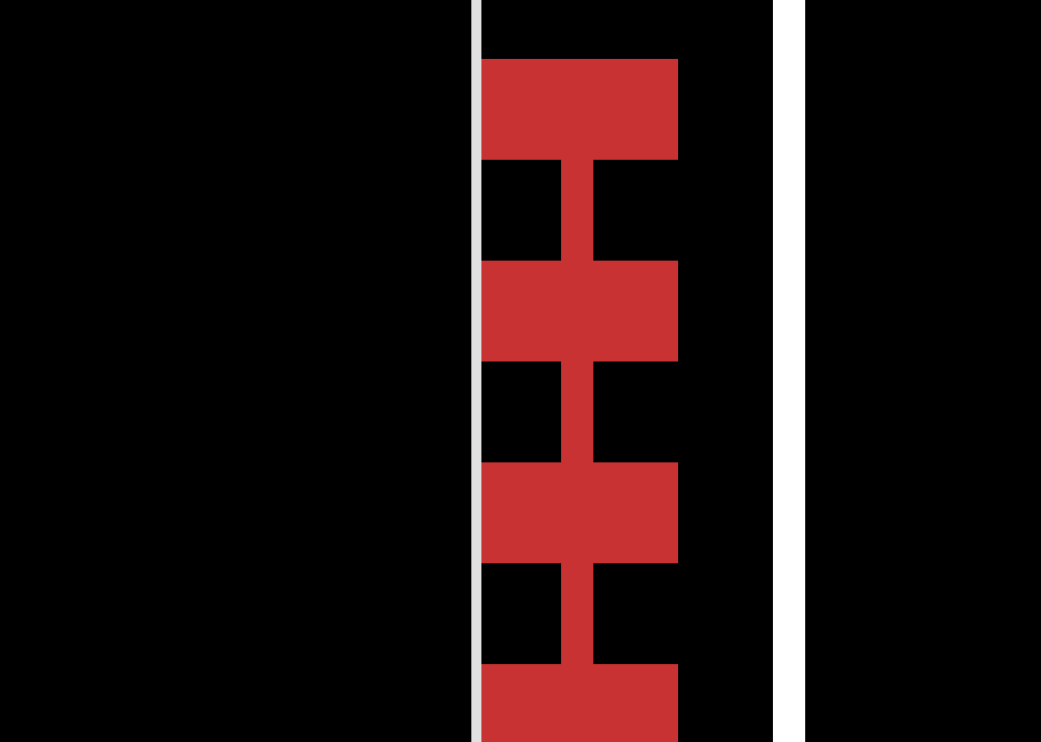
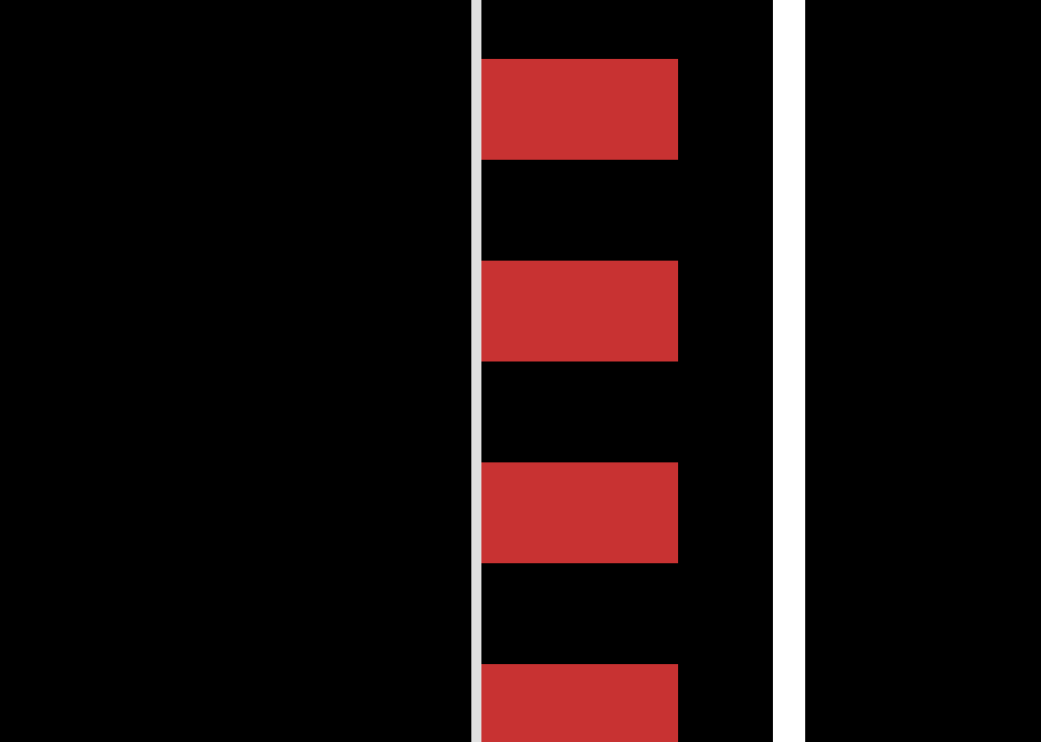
track: (577, 109) (577, 482) (587, 492) (587, 502) (577, 512) (577, 714) -> none

